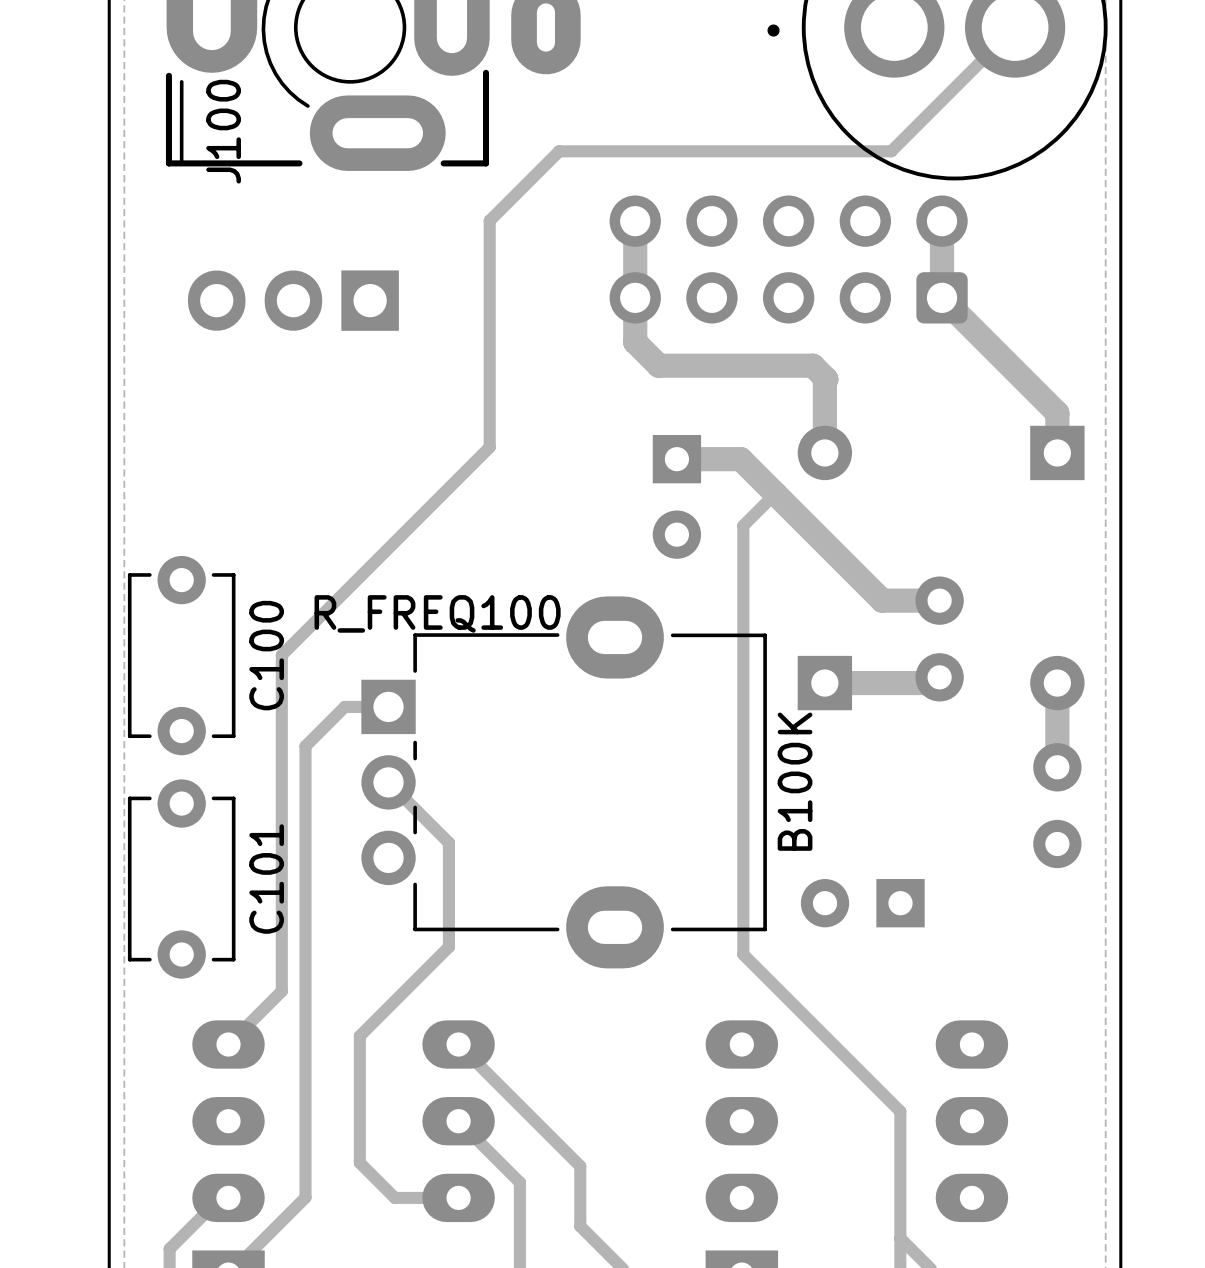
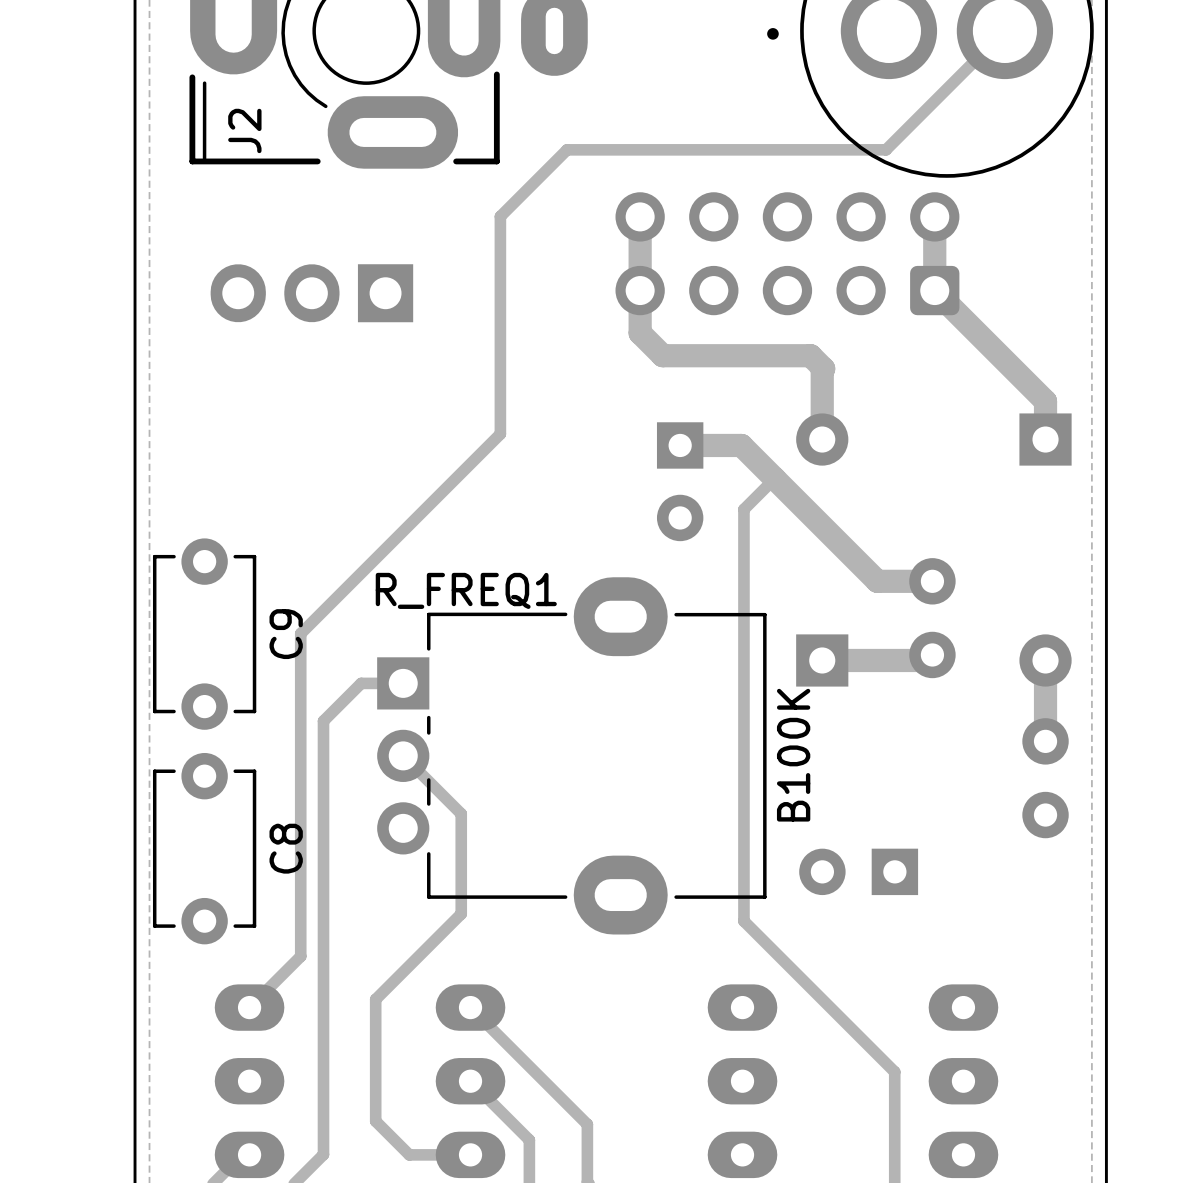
J100 name: J100 (223, 131) -> J2 (244, 130)
R_FREQ100 name: R_FREQ100 (437, 613) -> R_FREQ1 (466, 590)
C100 name: C100 (266, 655) -> C9 (286, 634)
C101 name: C101 (266, 879) -> C8 (286, 848)

